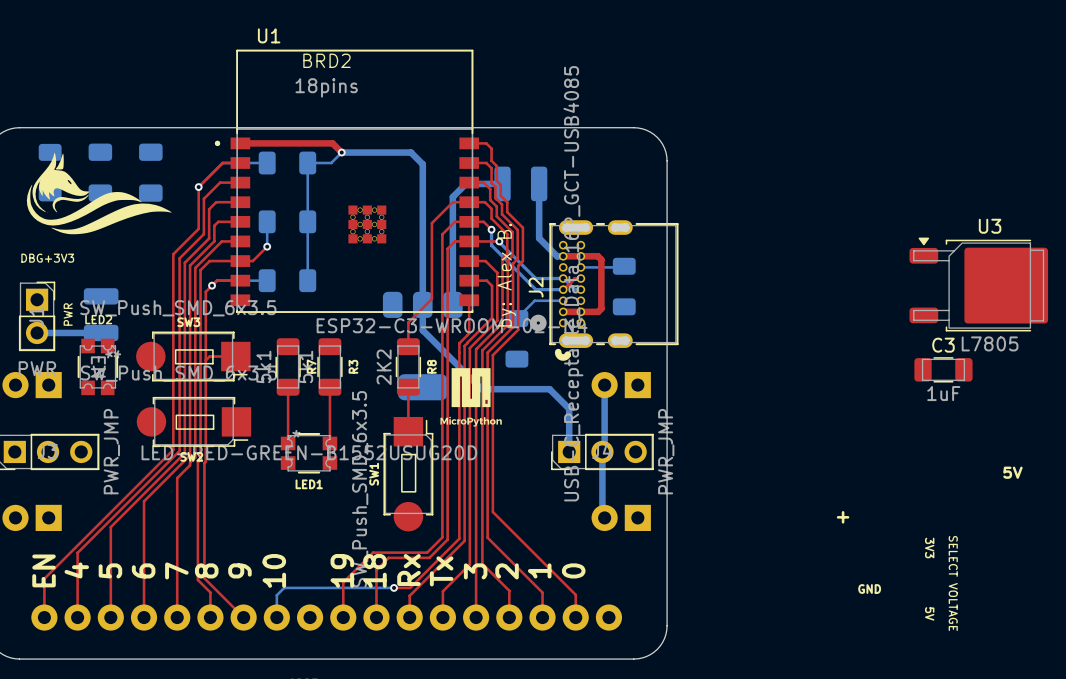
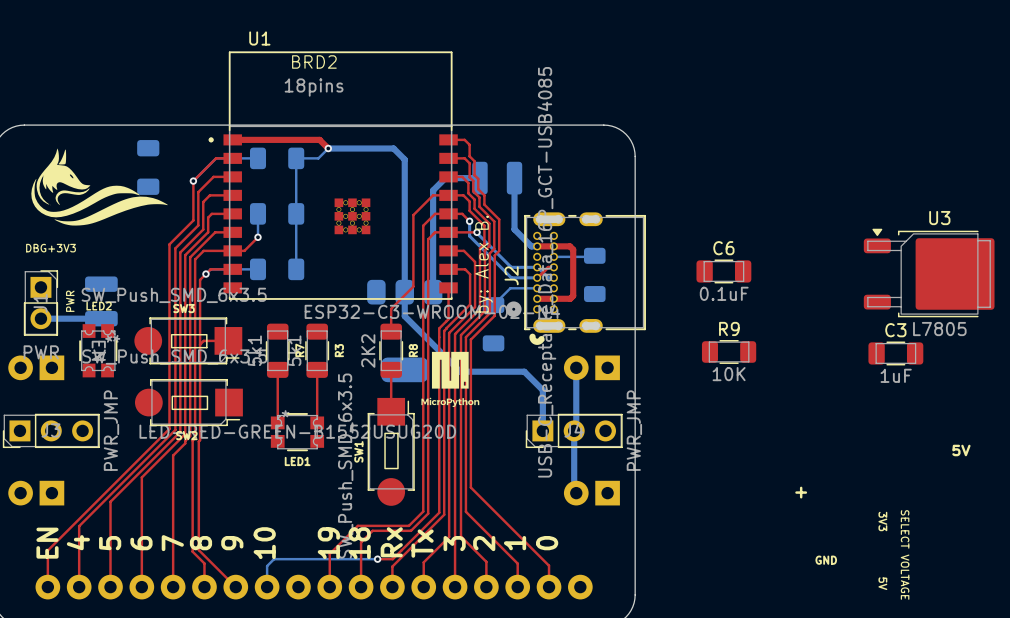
part: (50, 172) -> none
part: (100, 172) -> none
C6: none -> 0.1uF (723, 271)
R9: none -> 10K (729, 351)

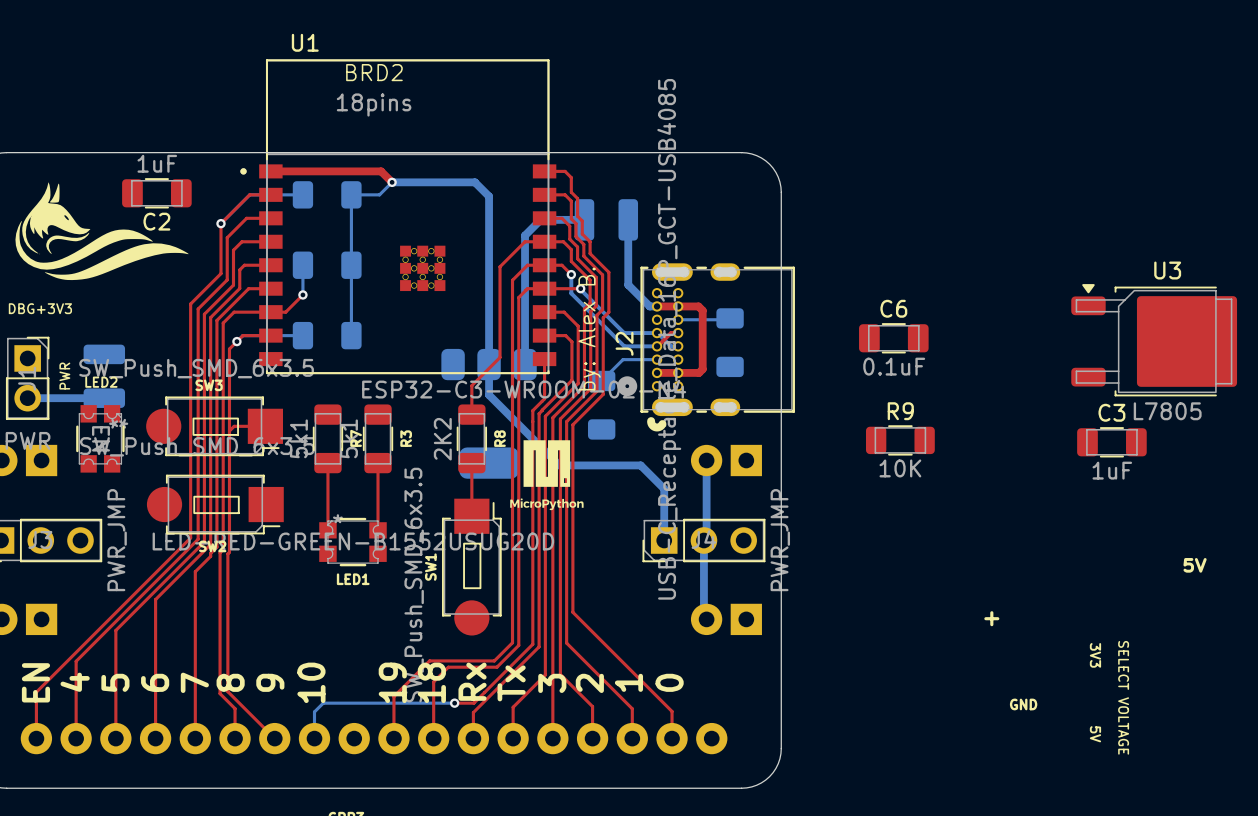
C2 side: bottom (148, 167) -> top (156, 193)

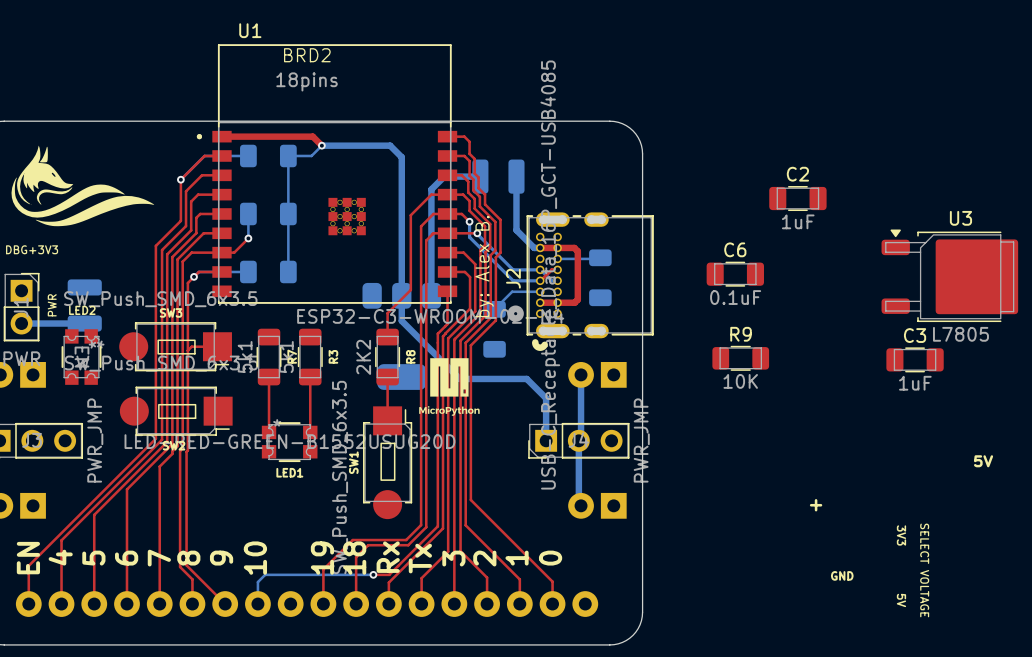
C2 value position: 1uF (157, 163) -> 1uF (798, 221)
C2 position: (156, 193) -> (797, 198)
C2 name position: C2 (156, 221) -> C2 (797, 174)

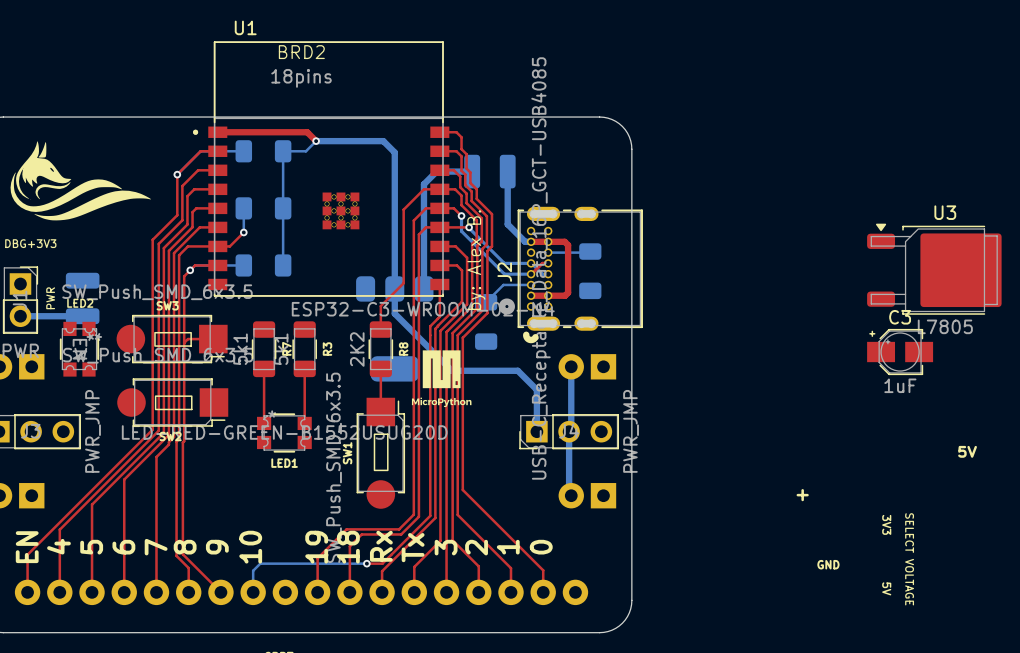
C2: 1uF (797, 198) -> none
C6: 0.1uF (735, 274) -> none
C3 footprint: [886, 347, 944, 373] -> [867, 328, 934, 376]
R9: 10K (740, 358) -> none

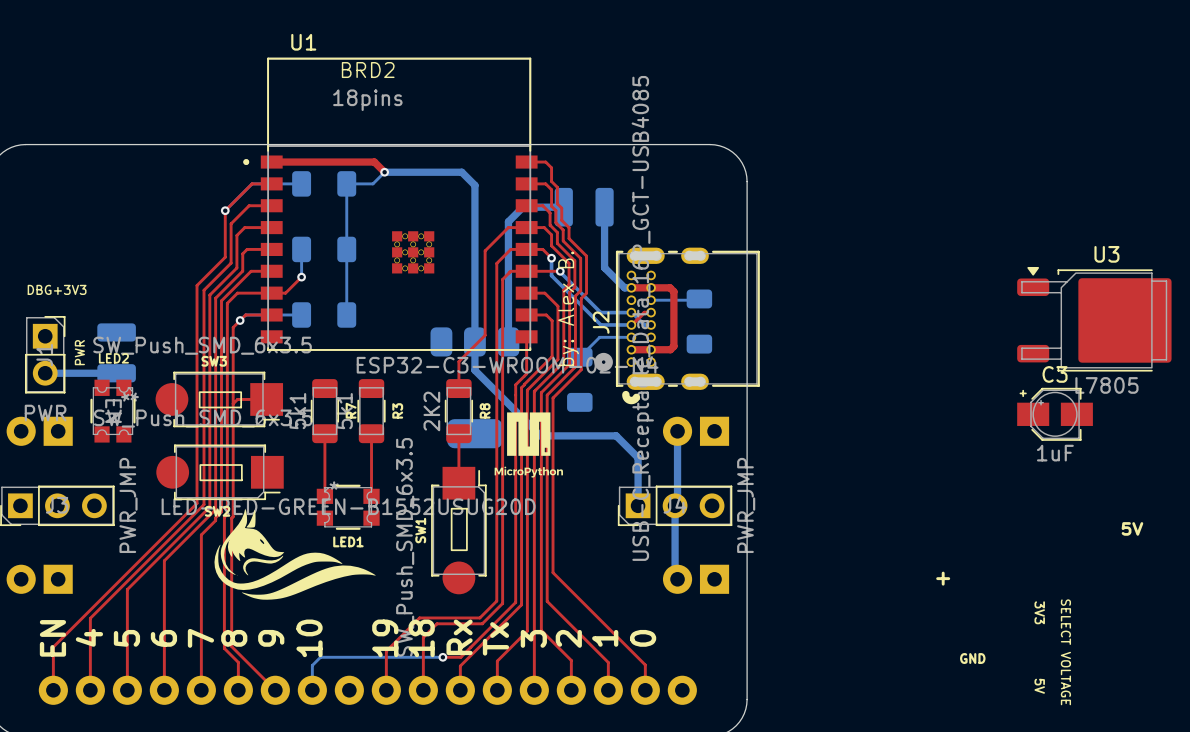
drawing: [10, 141, 152, 221] -> none
drawing: none -> [214, 508, 376, 600]

